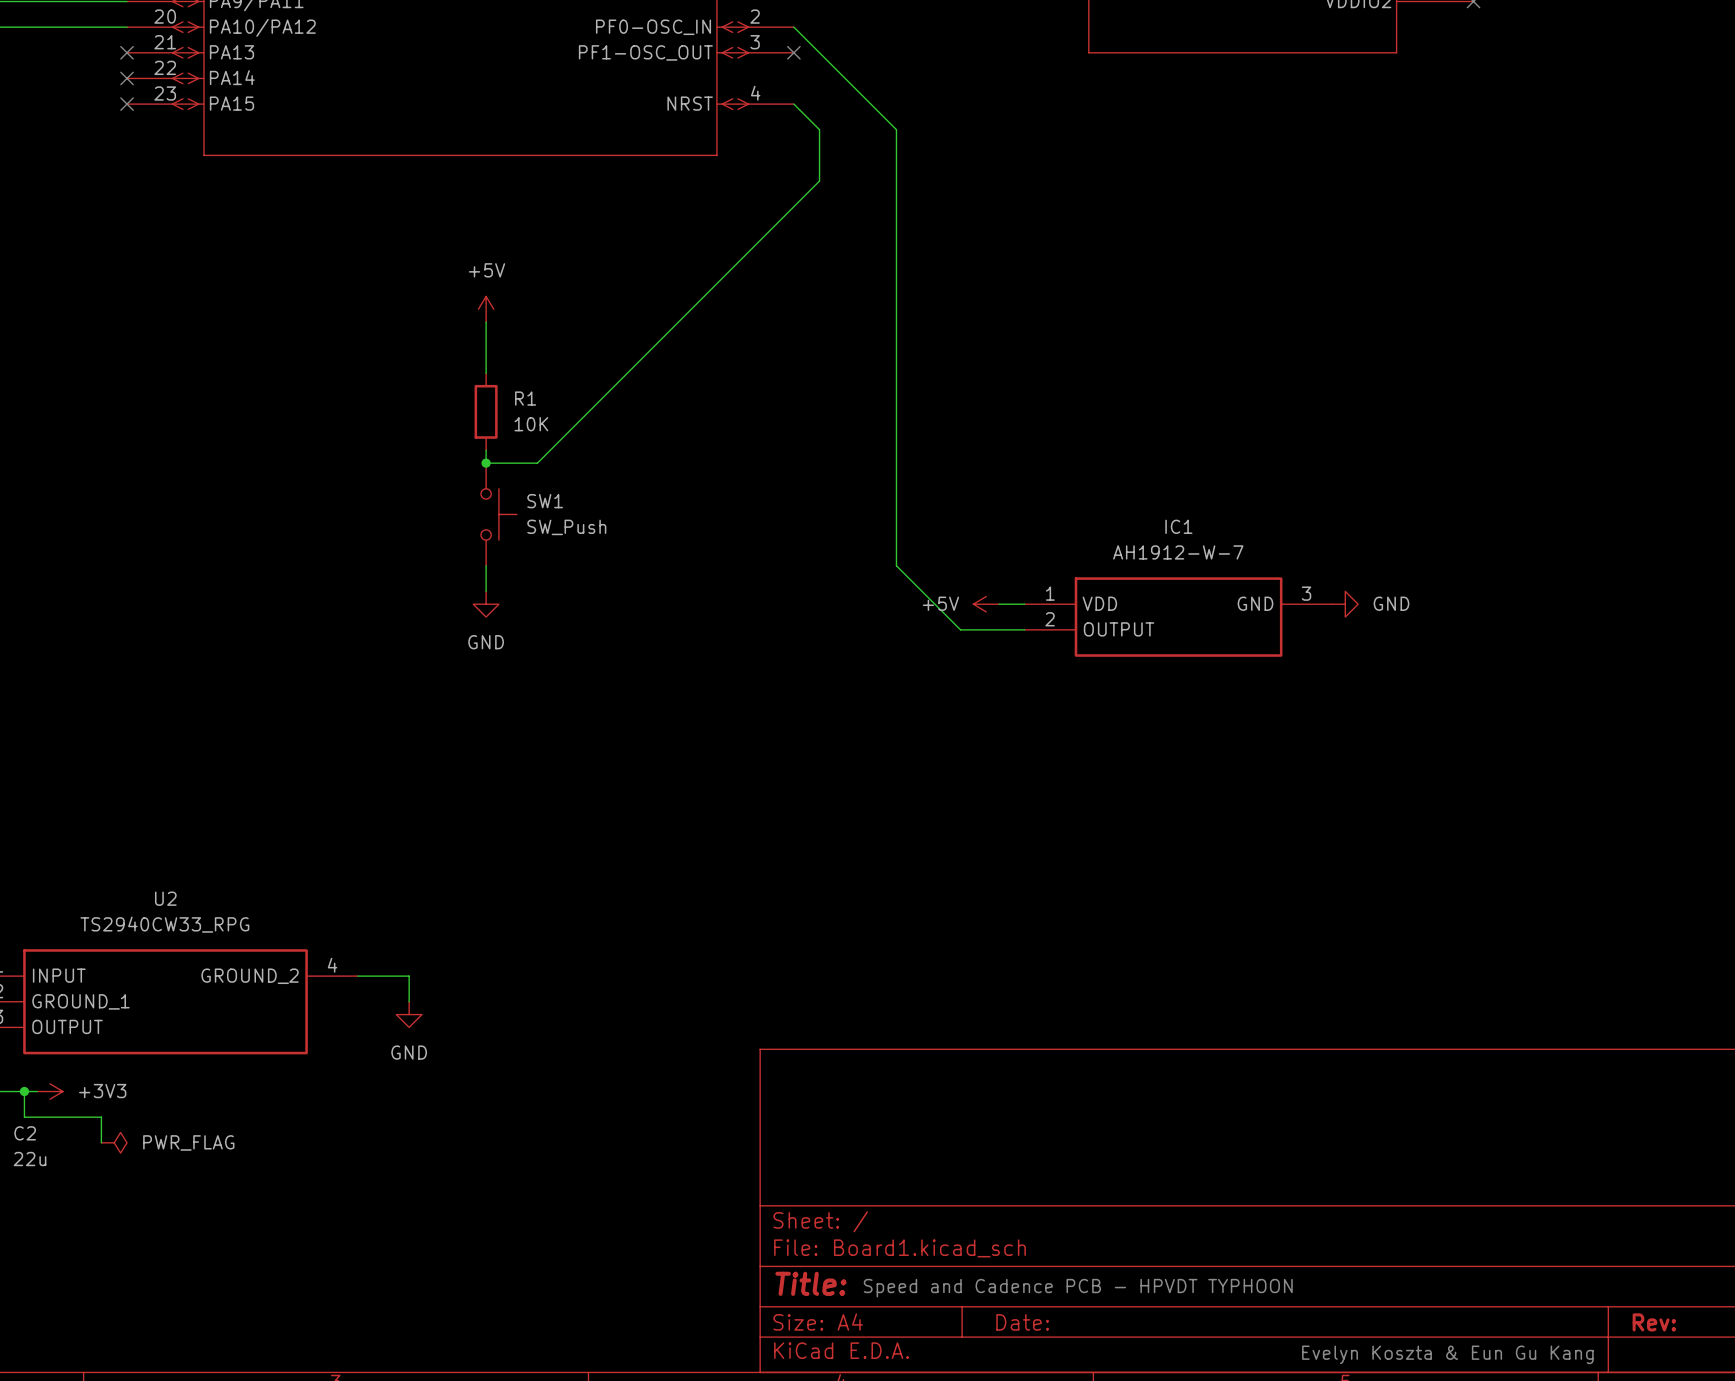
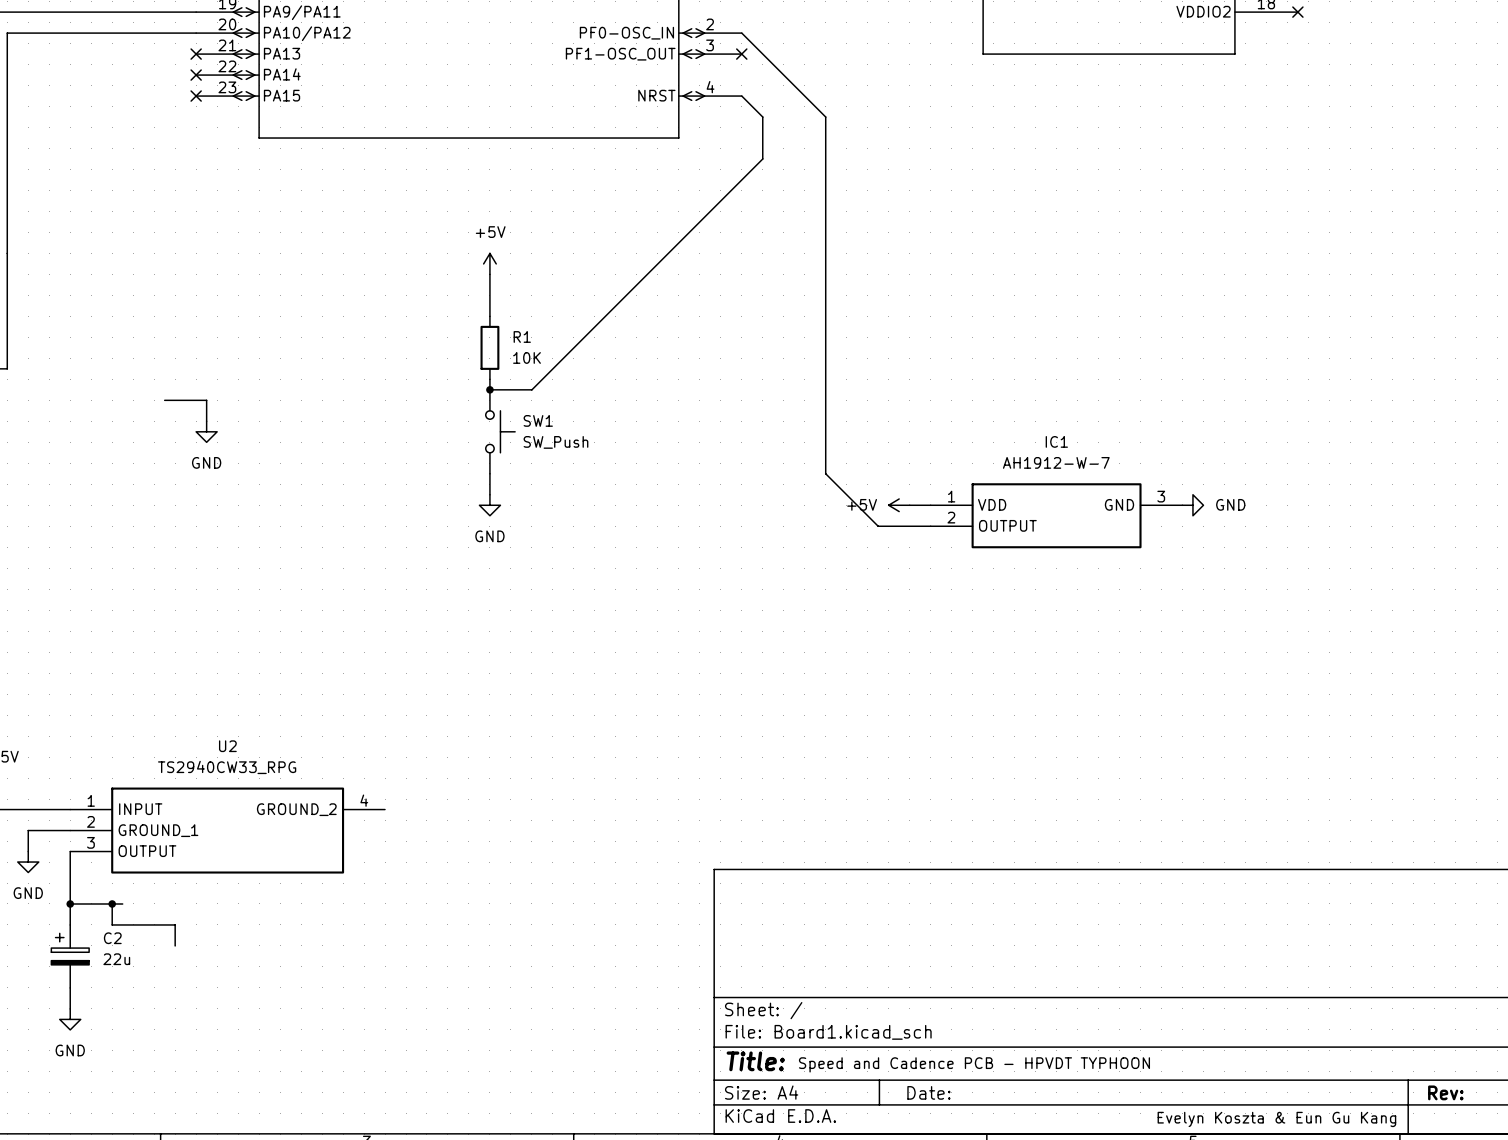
wire: none -> (164, 400) (206, 400) (206, 421)
power symbol: none -> GND (206, 431)
wire: (357, 976) (409, 976) (409, 1001) -> none
power symbol: GND (409, 1014) -> none
power symbol: +3V3 (50, 1091) -> none
power symbol: PWR_FLAG (114, 1142) -> none

